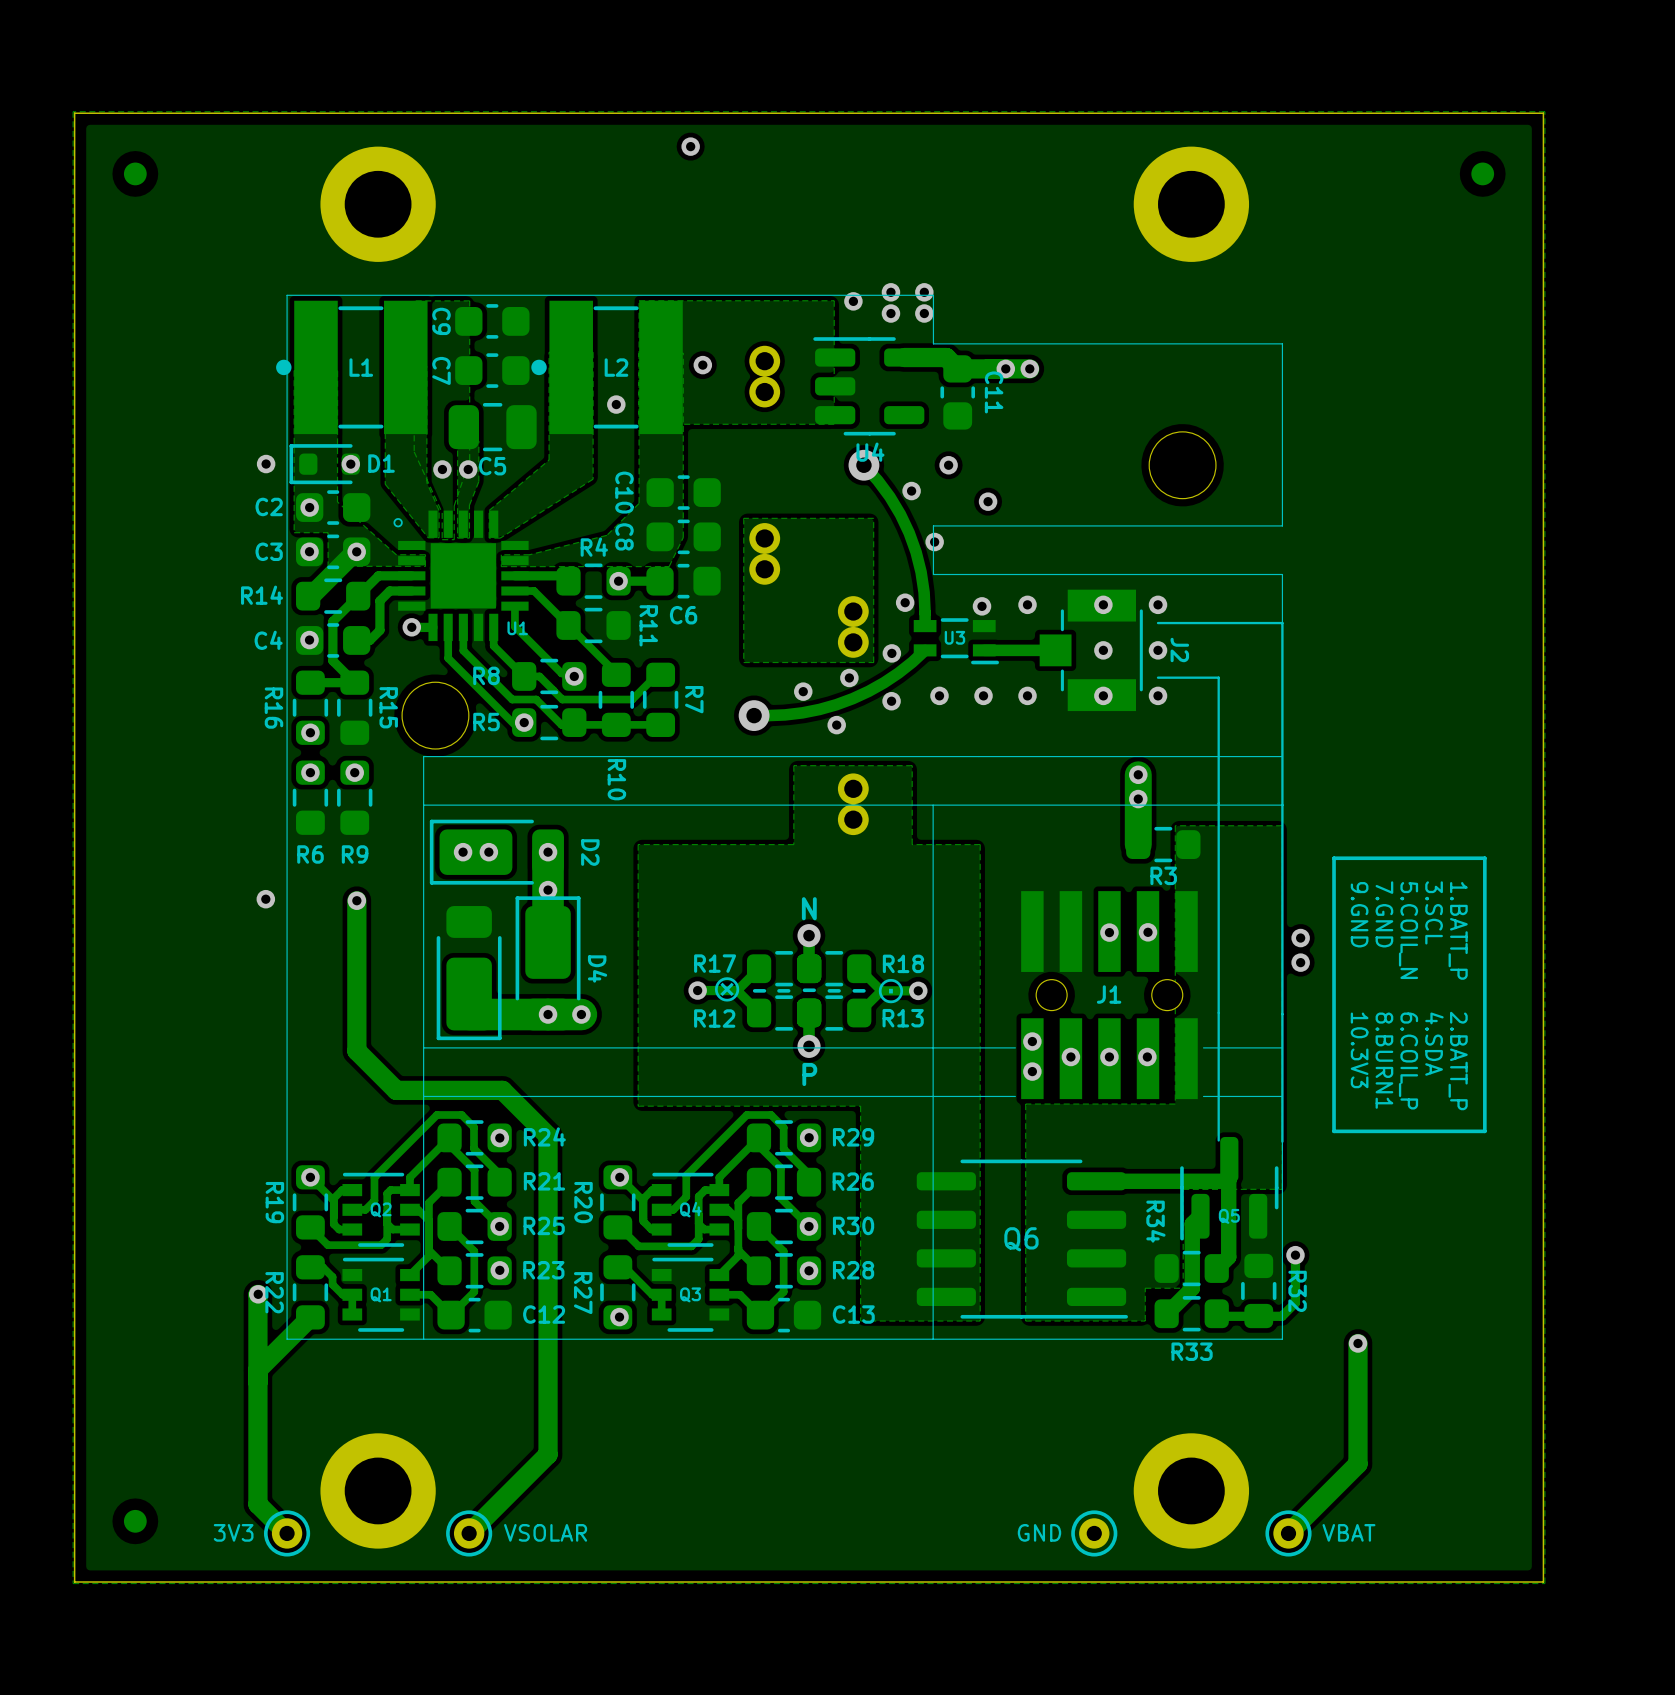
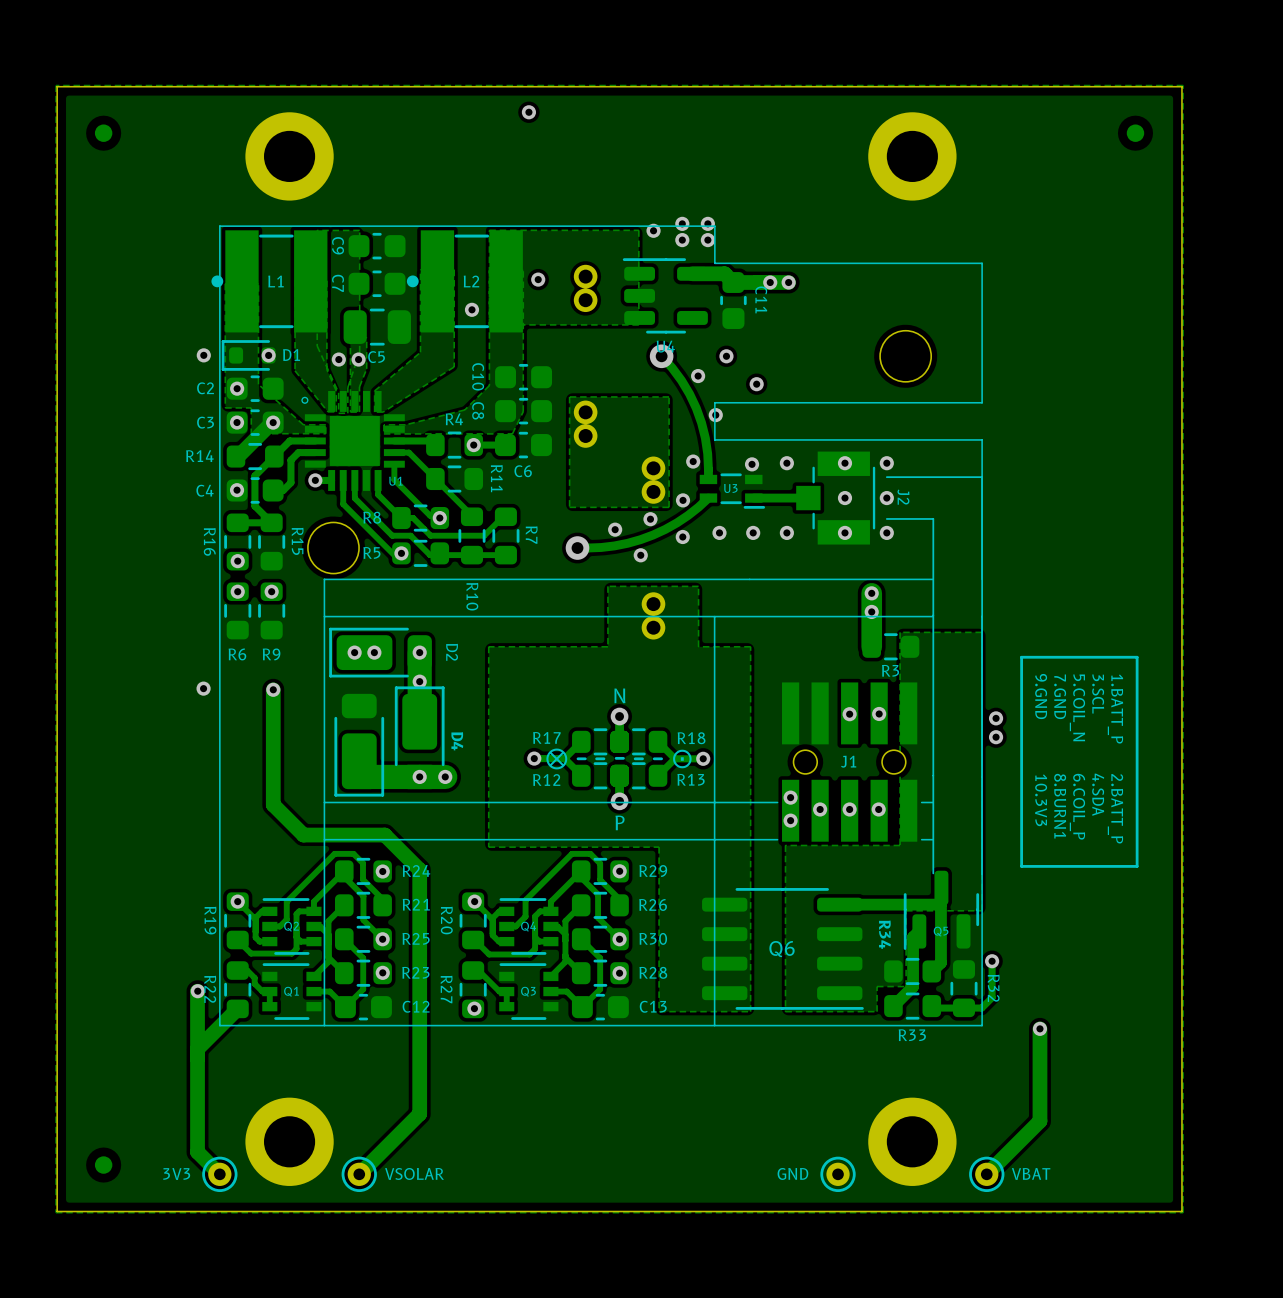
line: (1282, 756) (1218, 756) -> none
line: (1282, 805) (1218, 805) -> none
line: (1282, 1047) (1218, 1047) -> none
line: (1282, 1096) (1218, 1096) -> none

